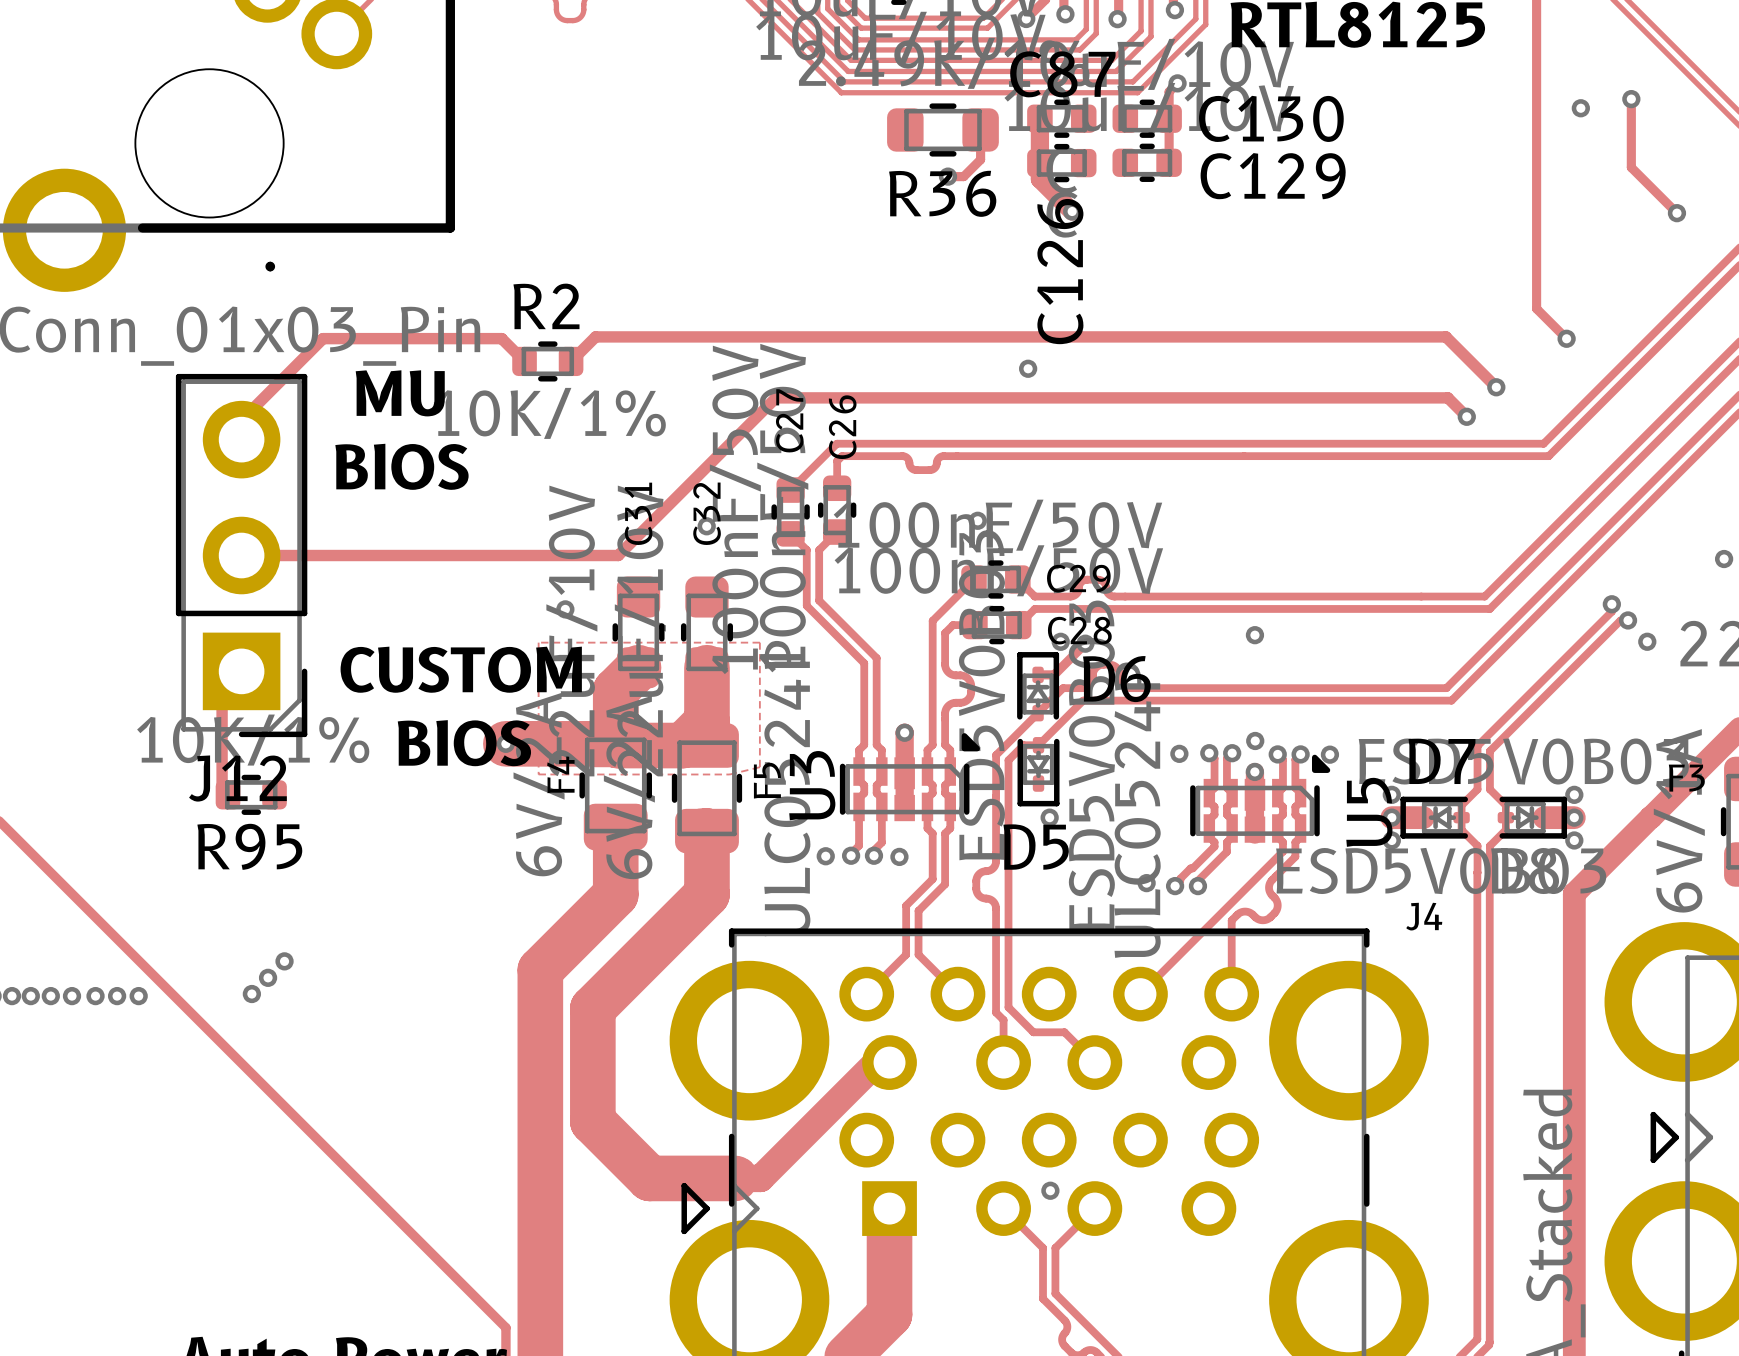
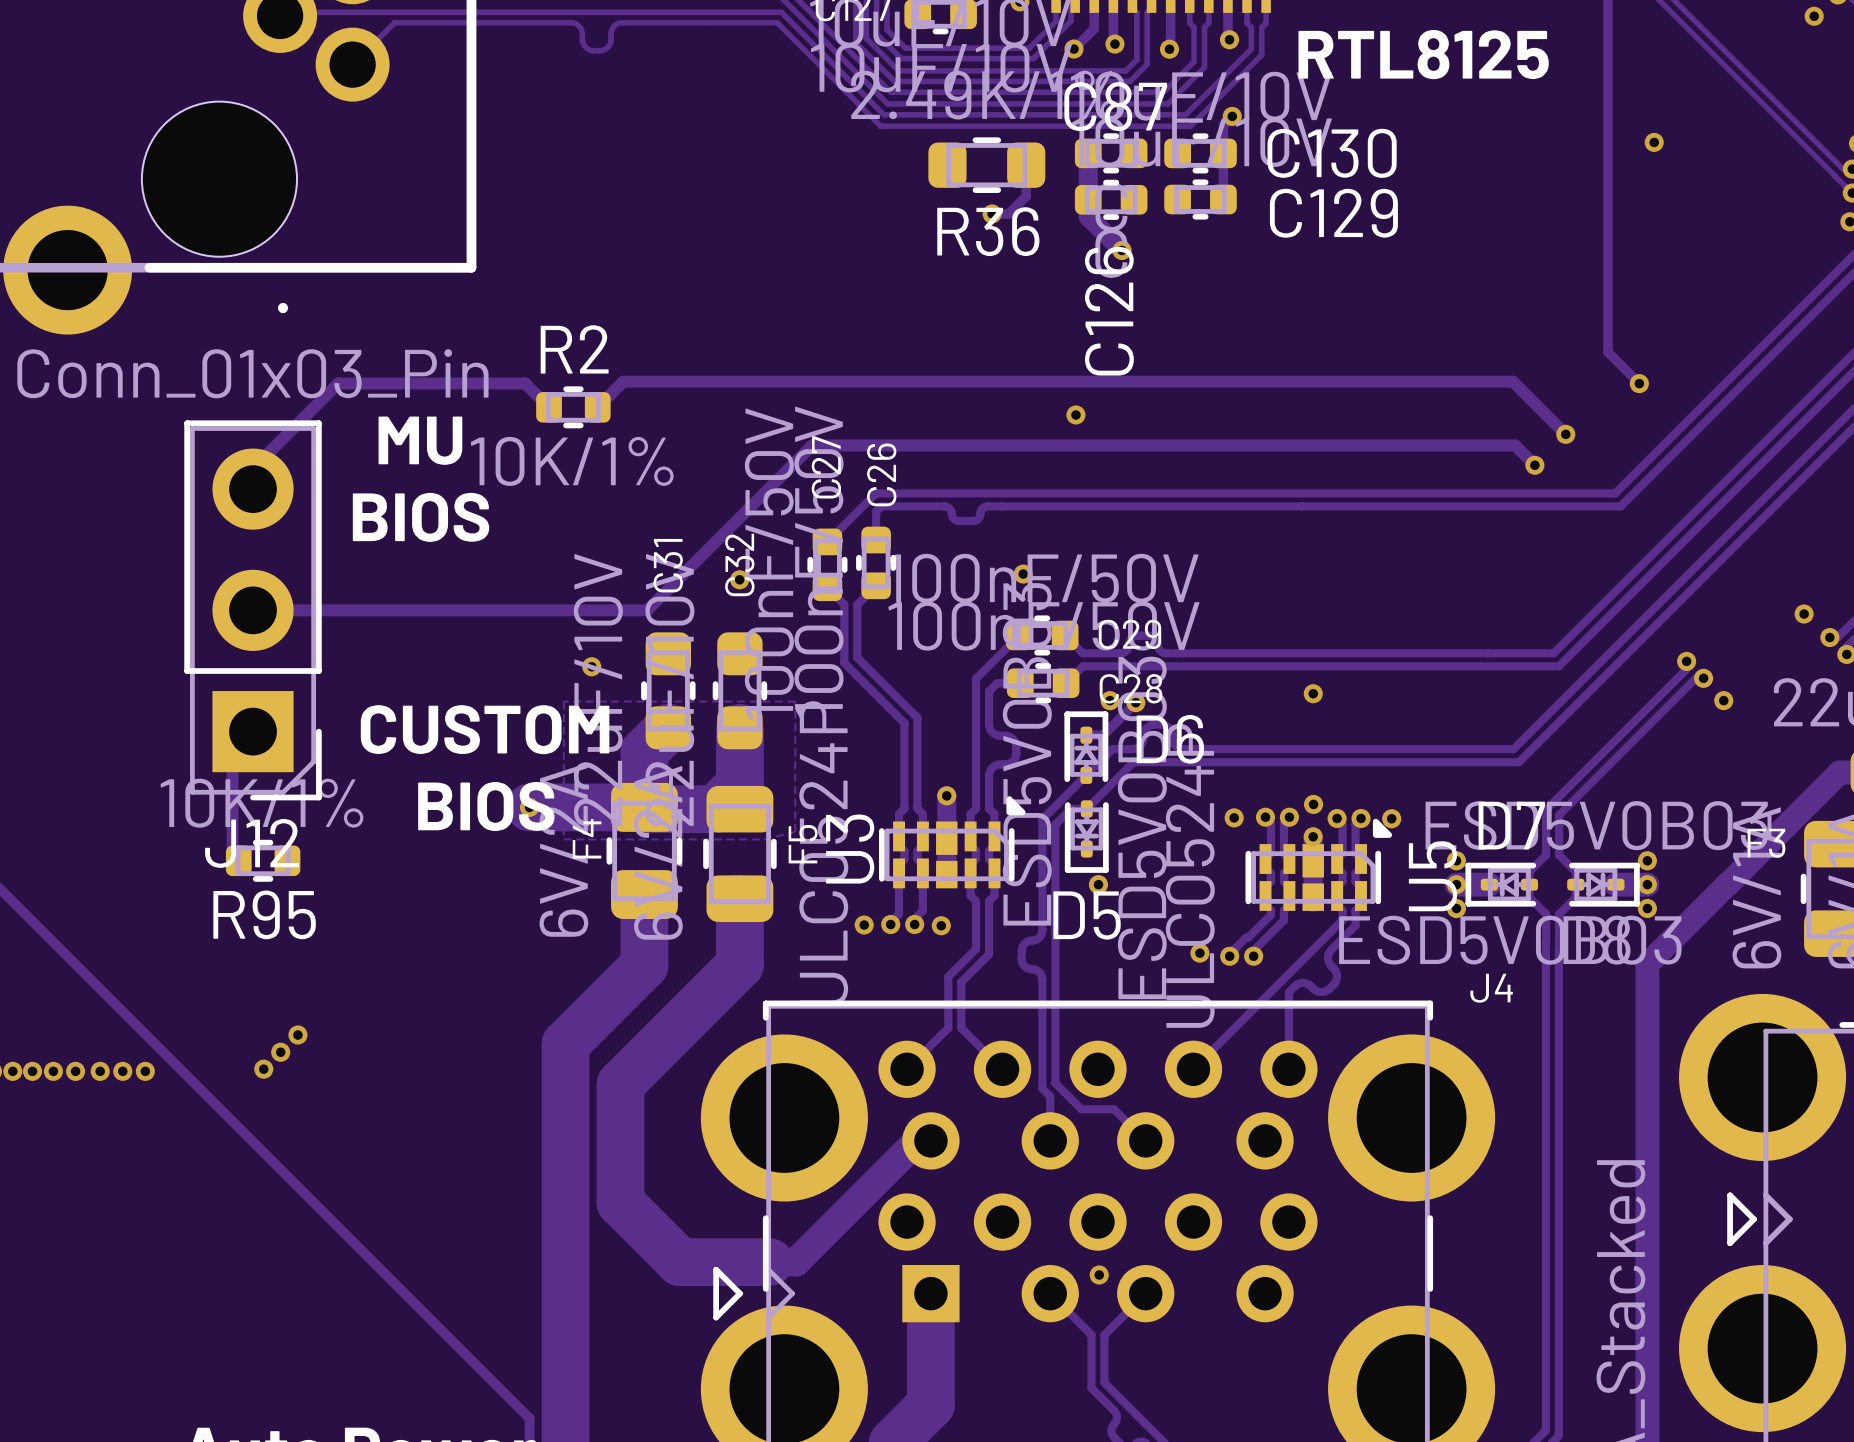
track: (1631, 99) (1631, 167) (1676, 213) -> none
via: (1631, 99) -> none
via: (1676, 213) -> none

